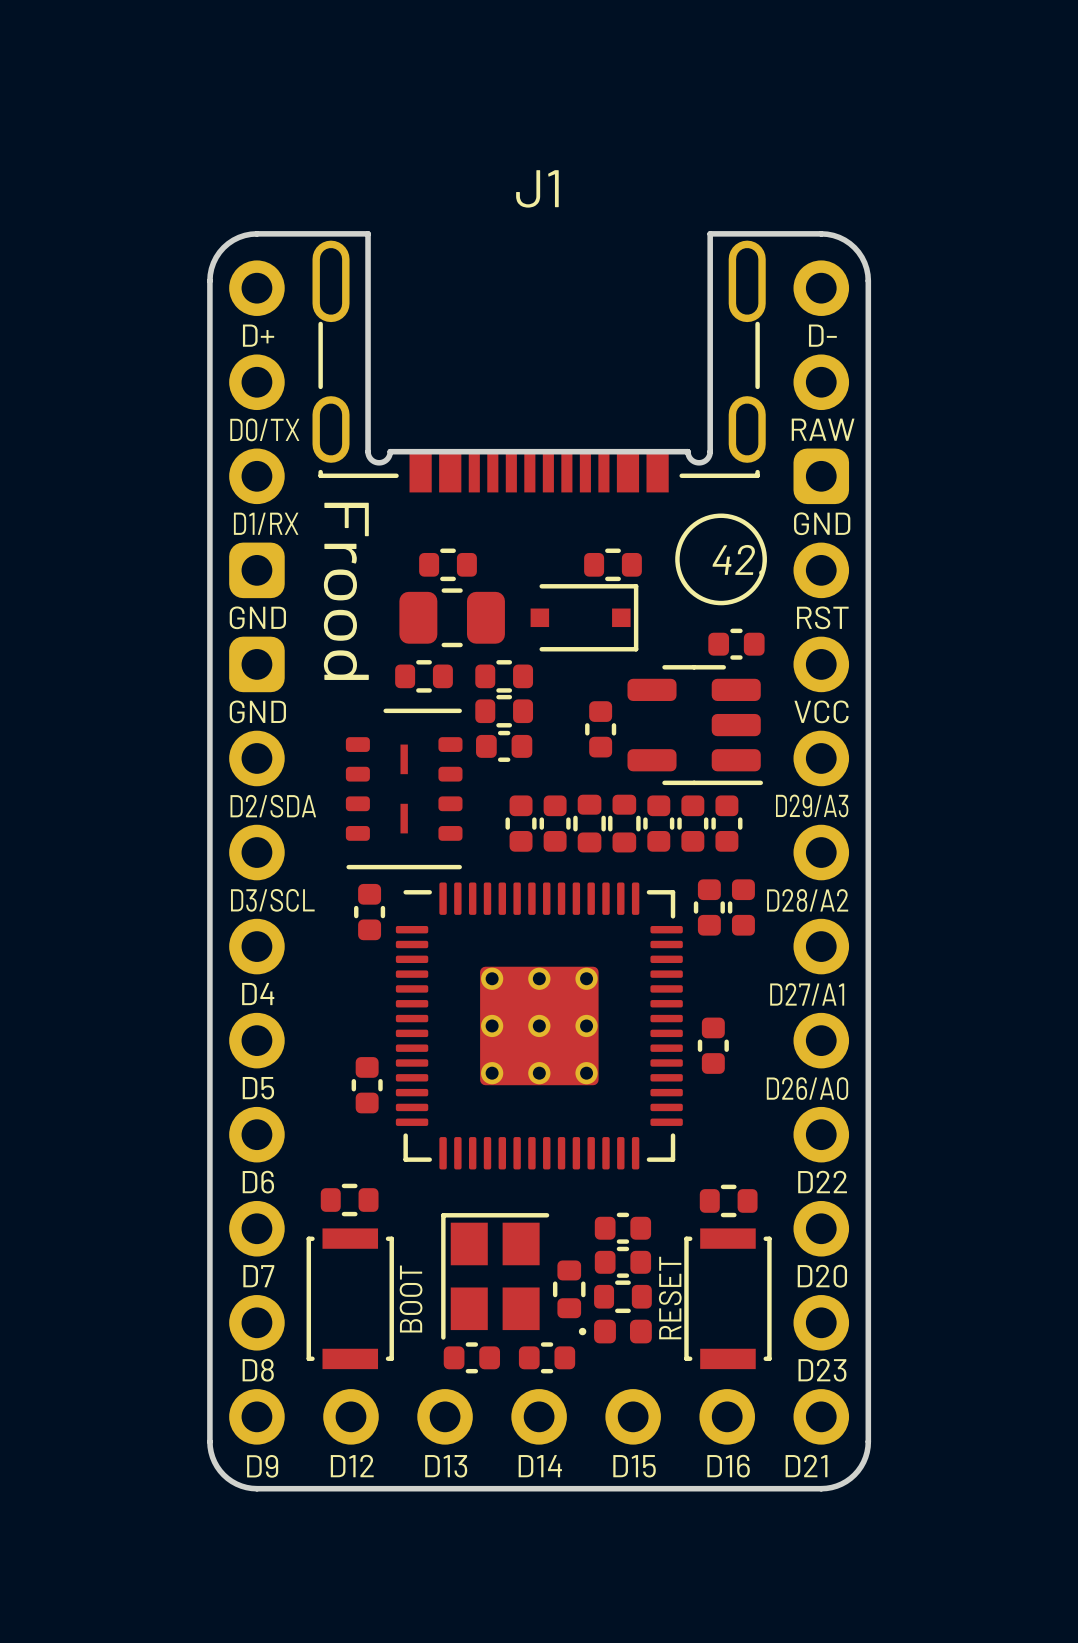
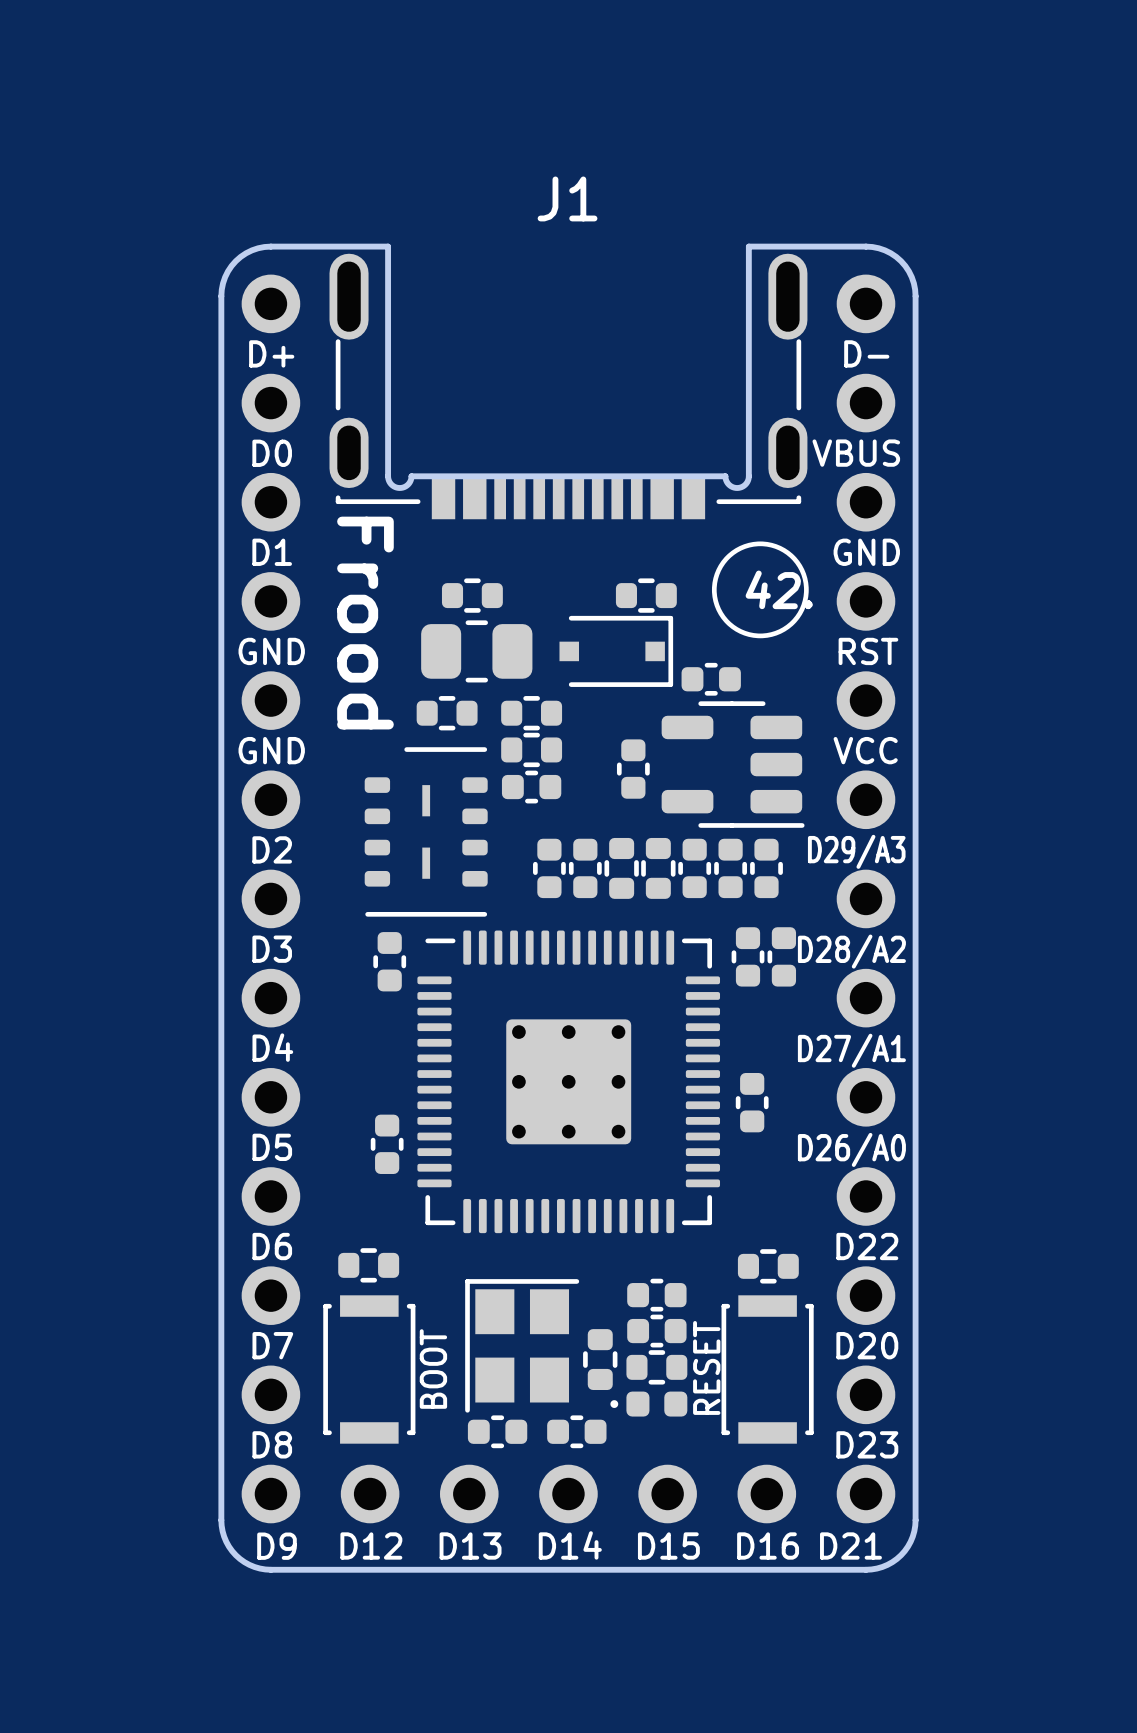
J1 footprint: [229, 260, 850, 1445] -> [241, 274, 896, 1524]
part position: (736, 644) -> (711, 679)

